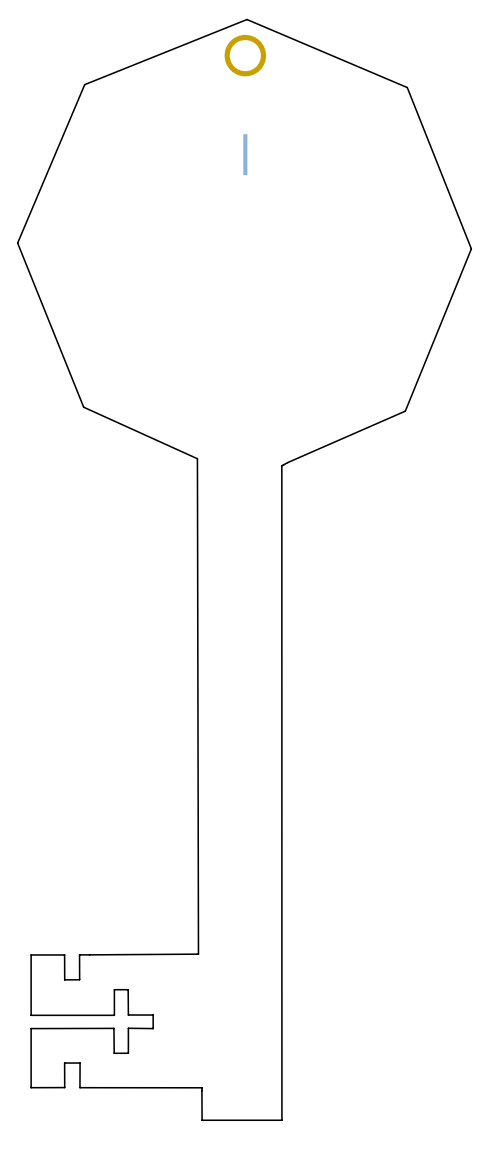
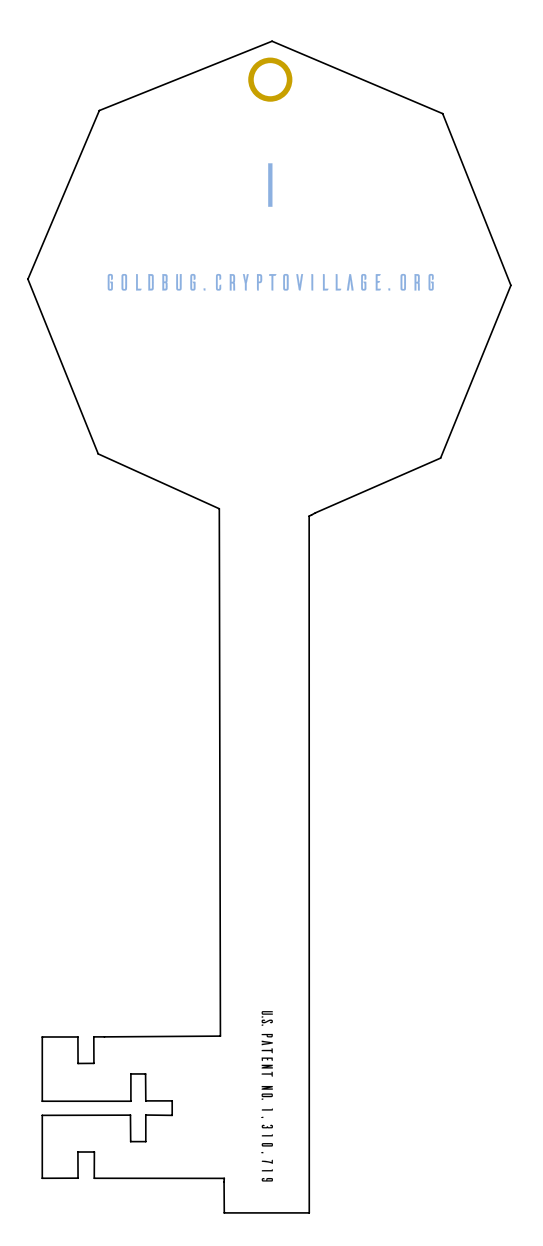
drawing: none -> [107, 273, 434, 291]
drawing: none -> [260, 1011, 274, 1182]

